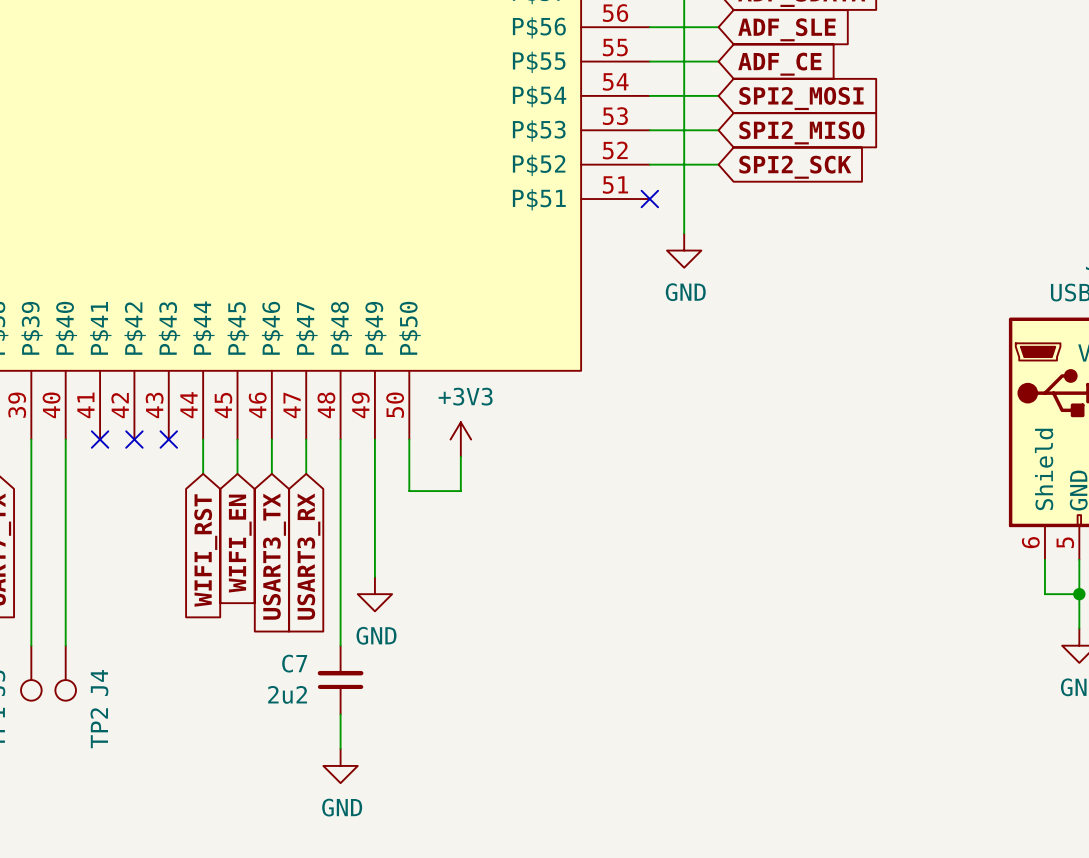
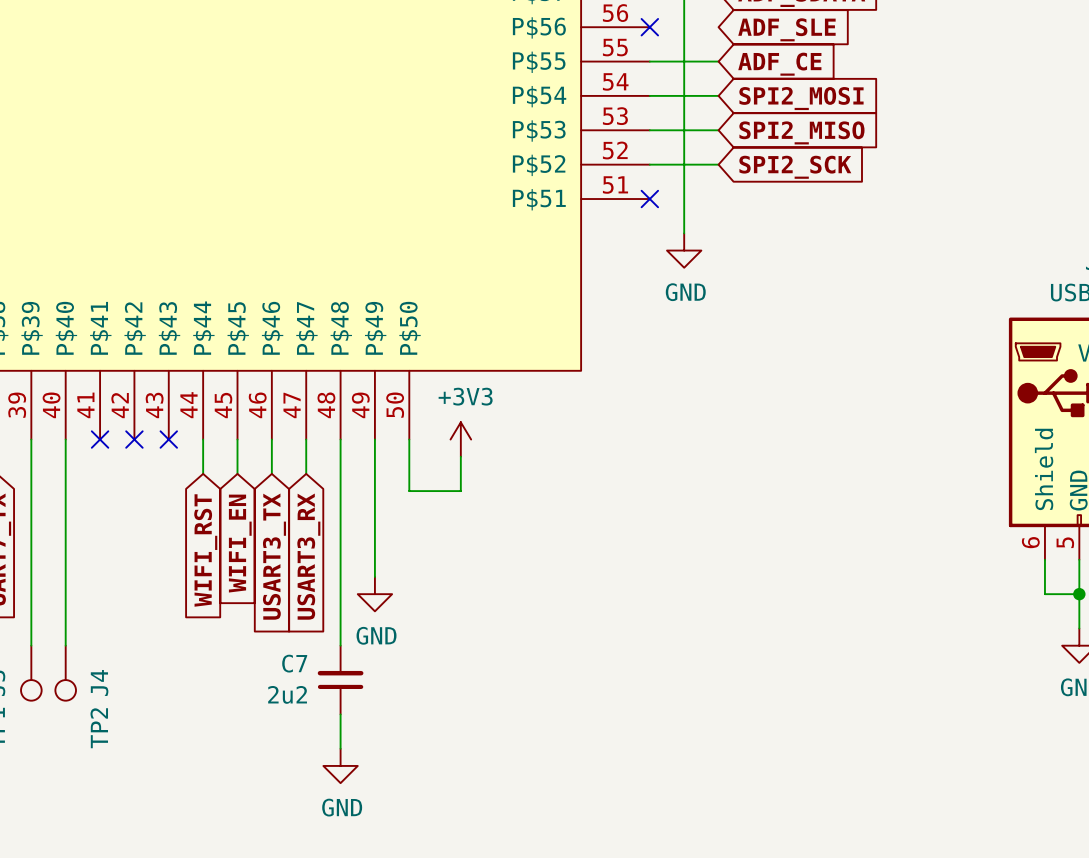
wire: (649, 27) (718, 27) -> none
no-connect mark: none -> (649, 27)

